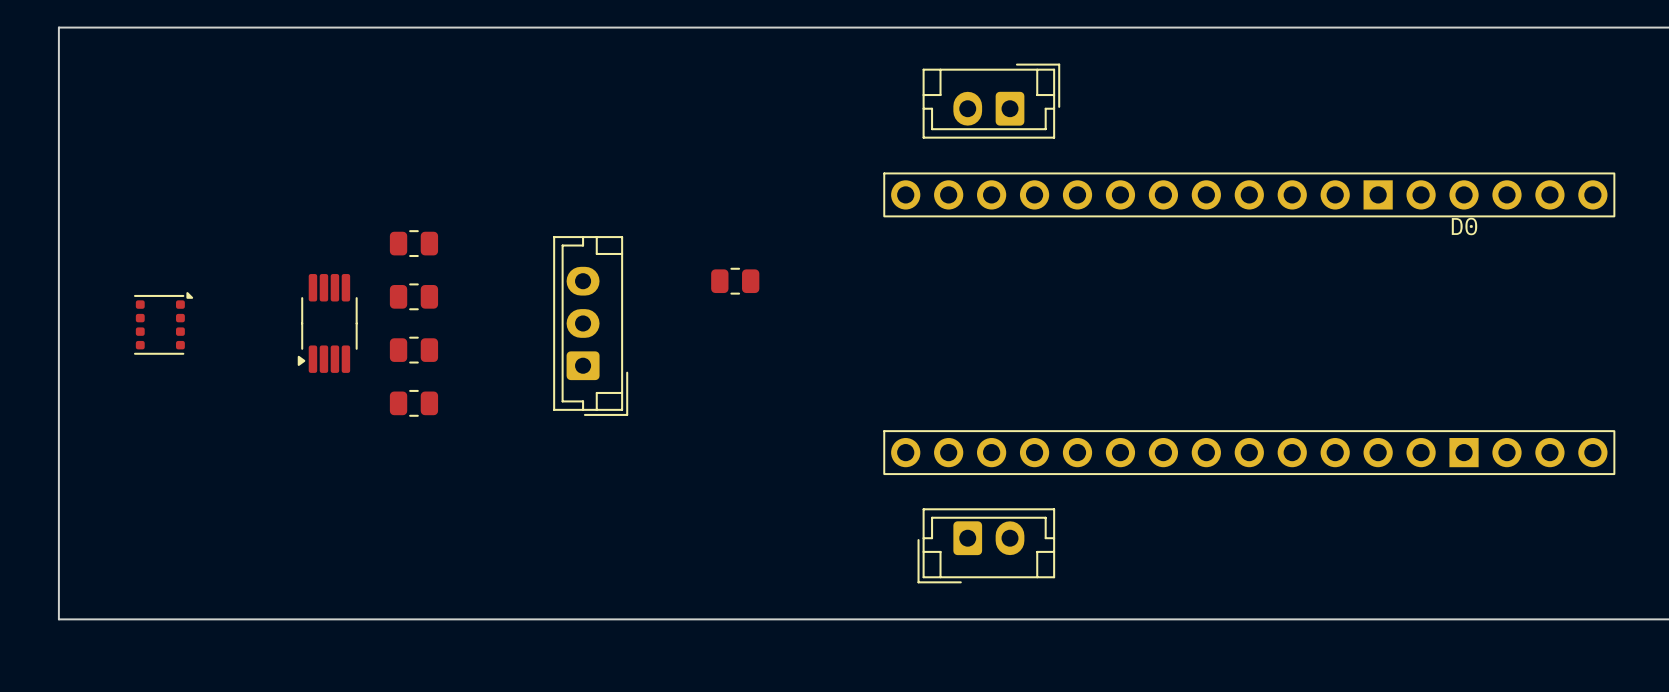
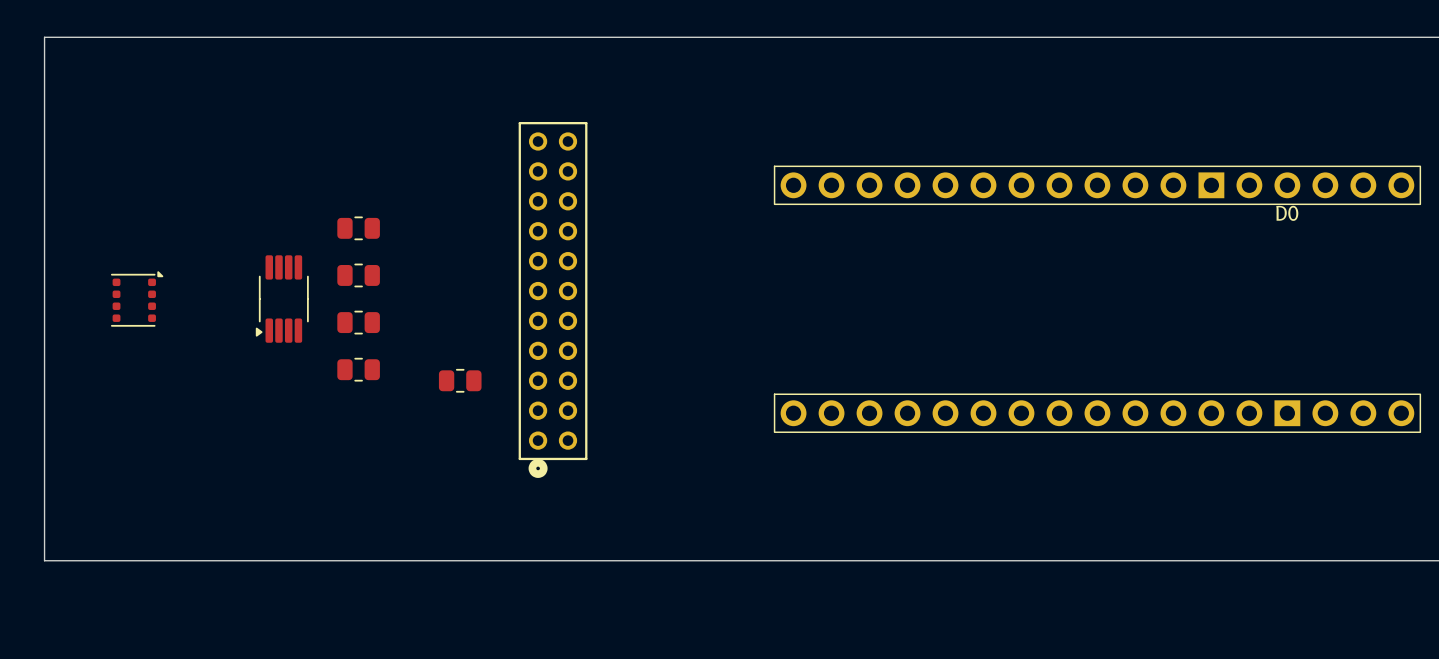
part: (991, 101) -> none
part position: (735, 281) -> (460, 380)
part: none -> (553, 299)
part: (590, 326) -> none
part: (986, 545) -> none

